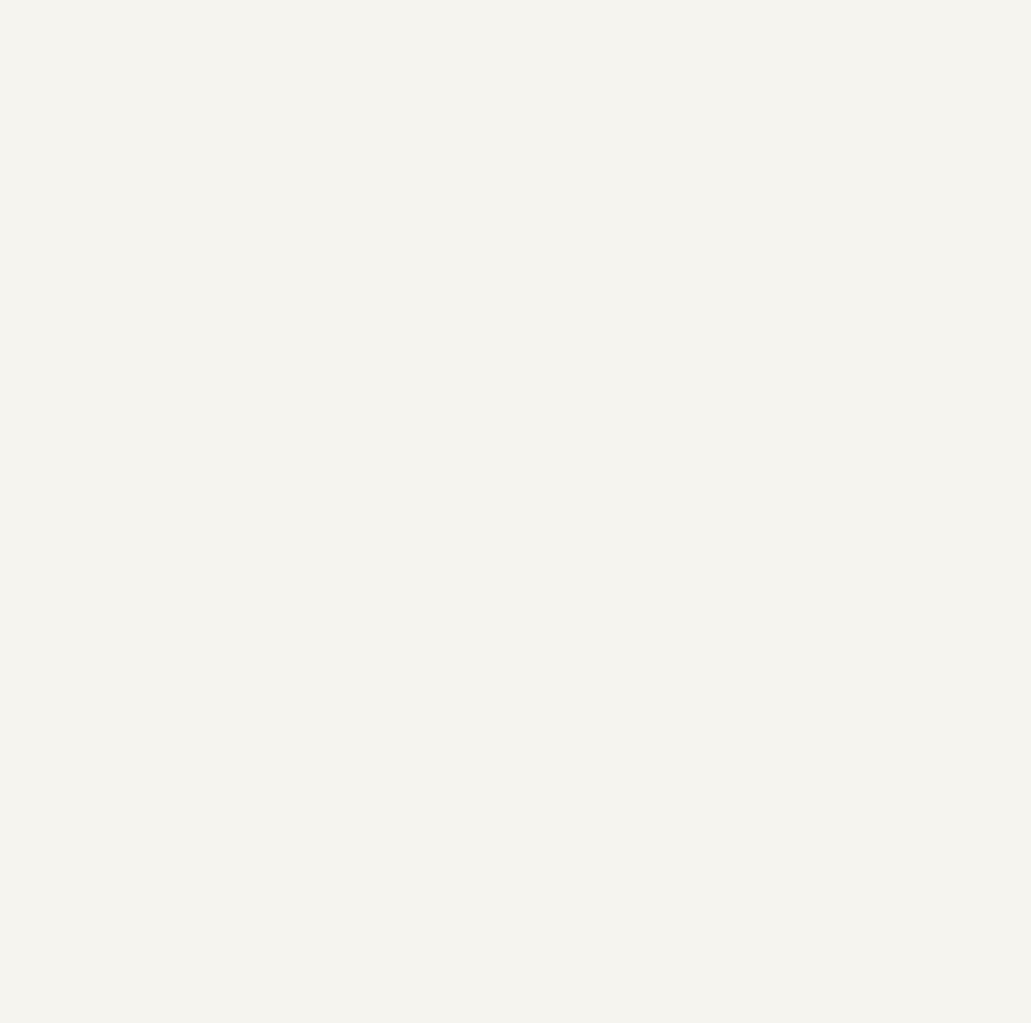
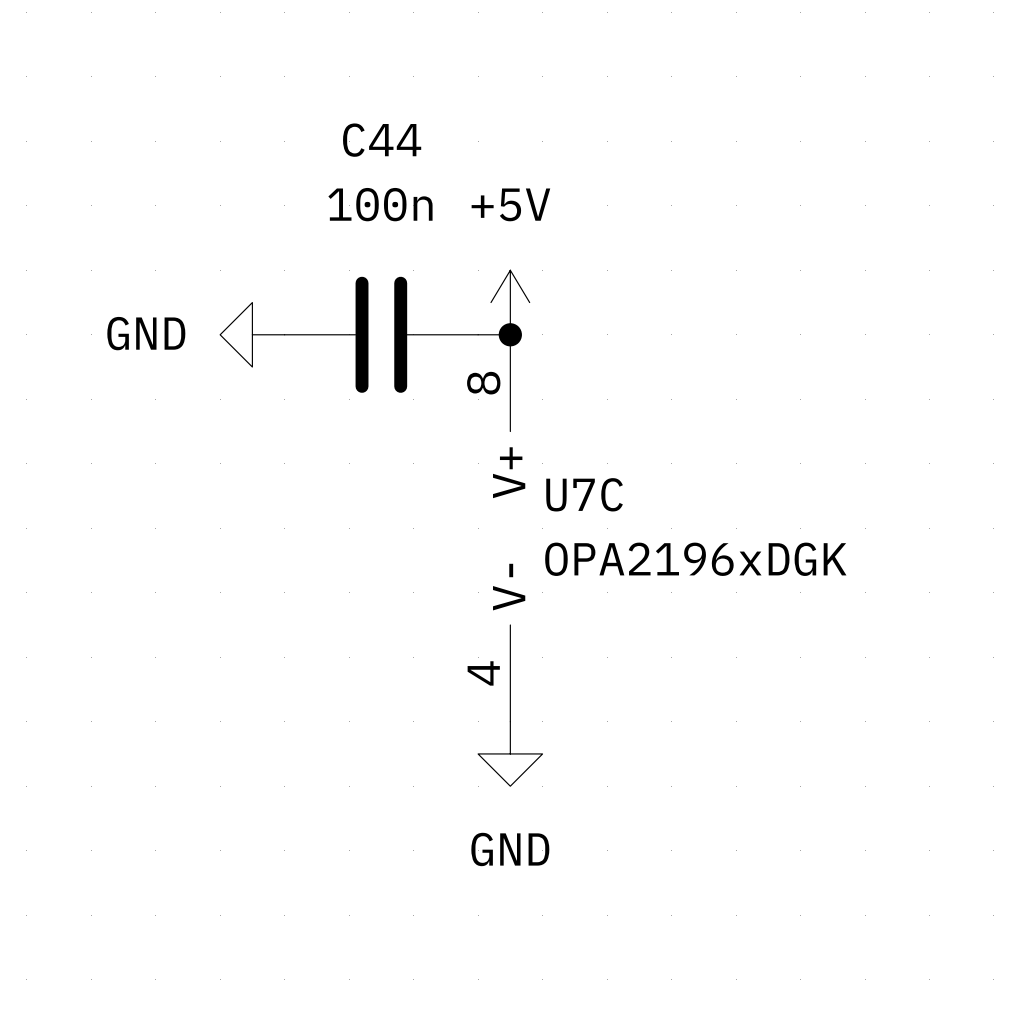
power symbol: none -> +5V (510, 302)
power symbol: none -> GND (252, 334)
C44: none -> 100n (381, 334)
wire: none -> (478, 334) (510, 334)
junction: none -> (510, 334)
U7C: none -> OPA2196xDGK (510, 528)
power symbol: none -> GND (510, 753)

